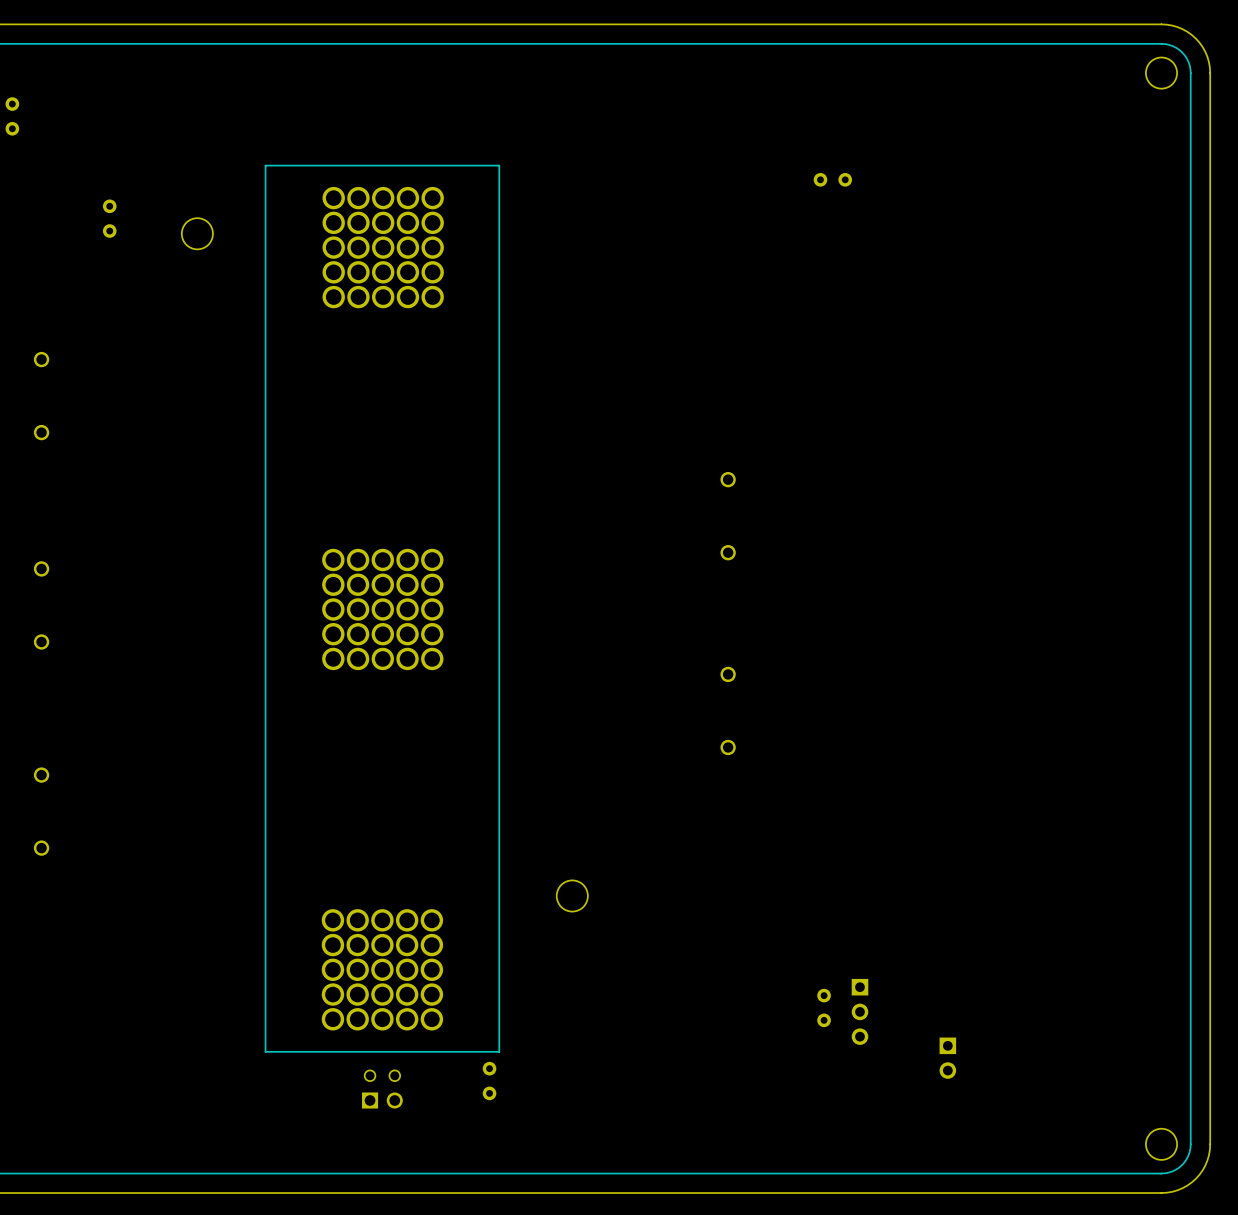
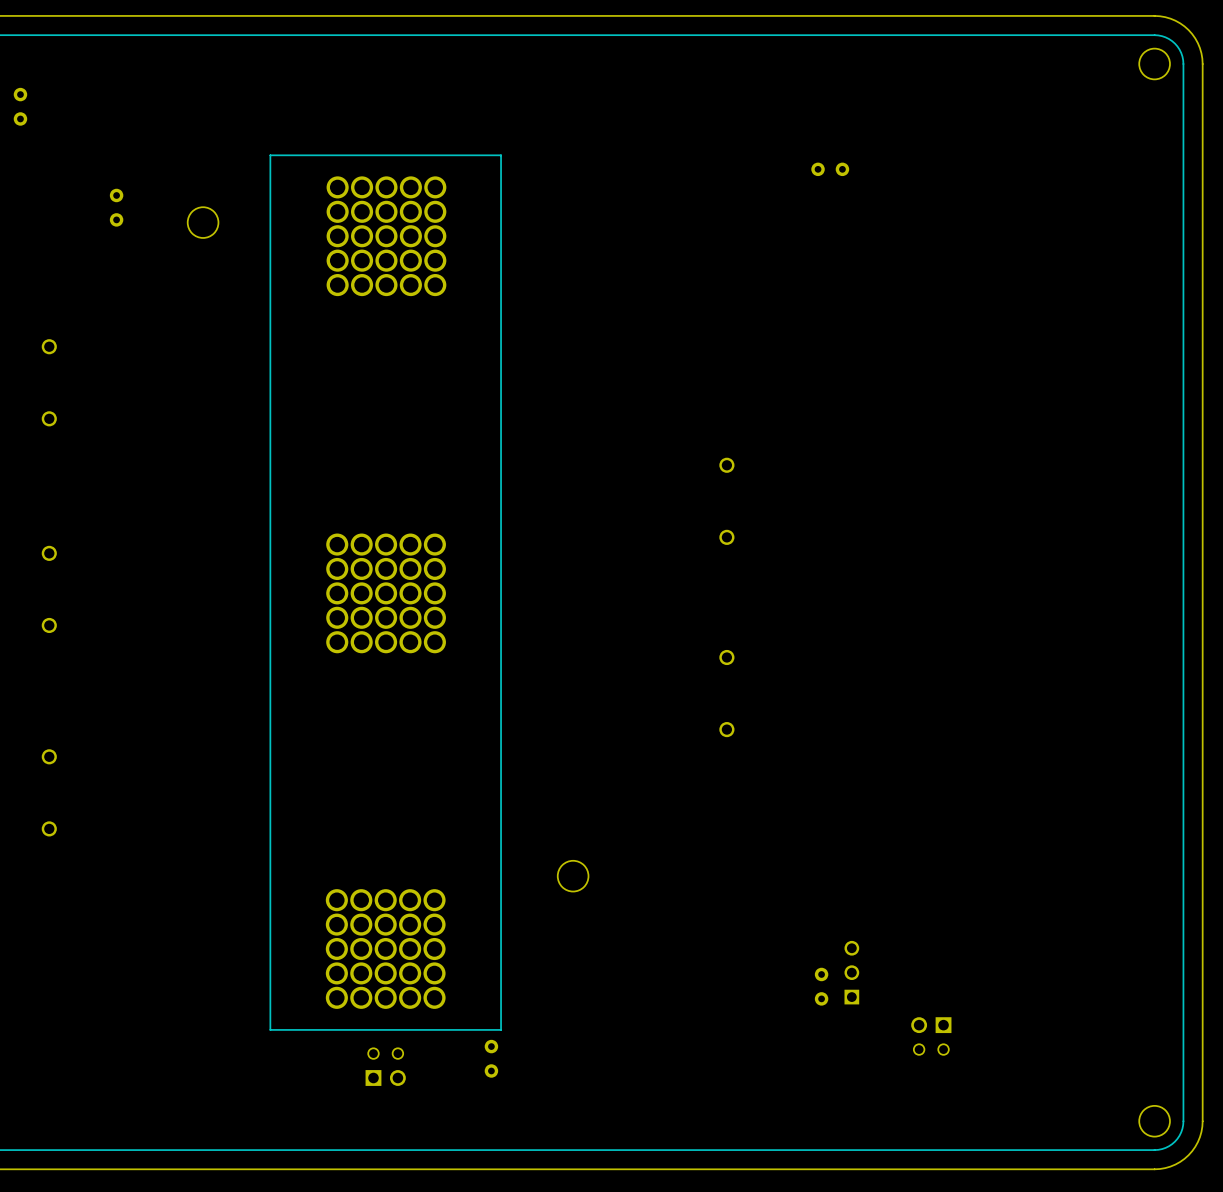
part: none -> (851, 972)
part: (860, 1011) -> none
part: none -> (931, 1036)
part: (947, 1058) -> none

